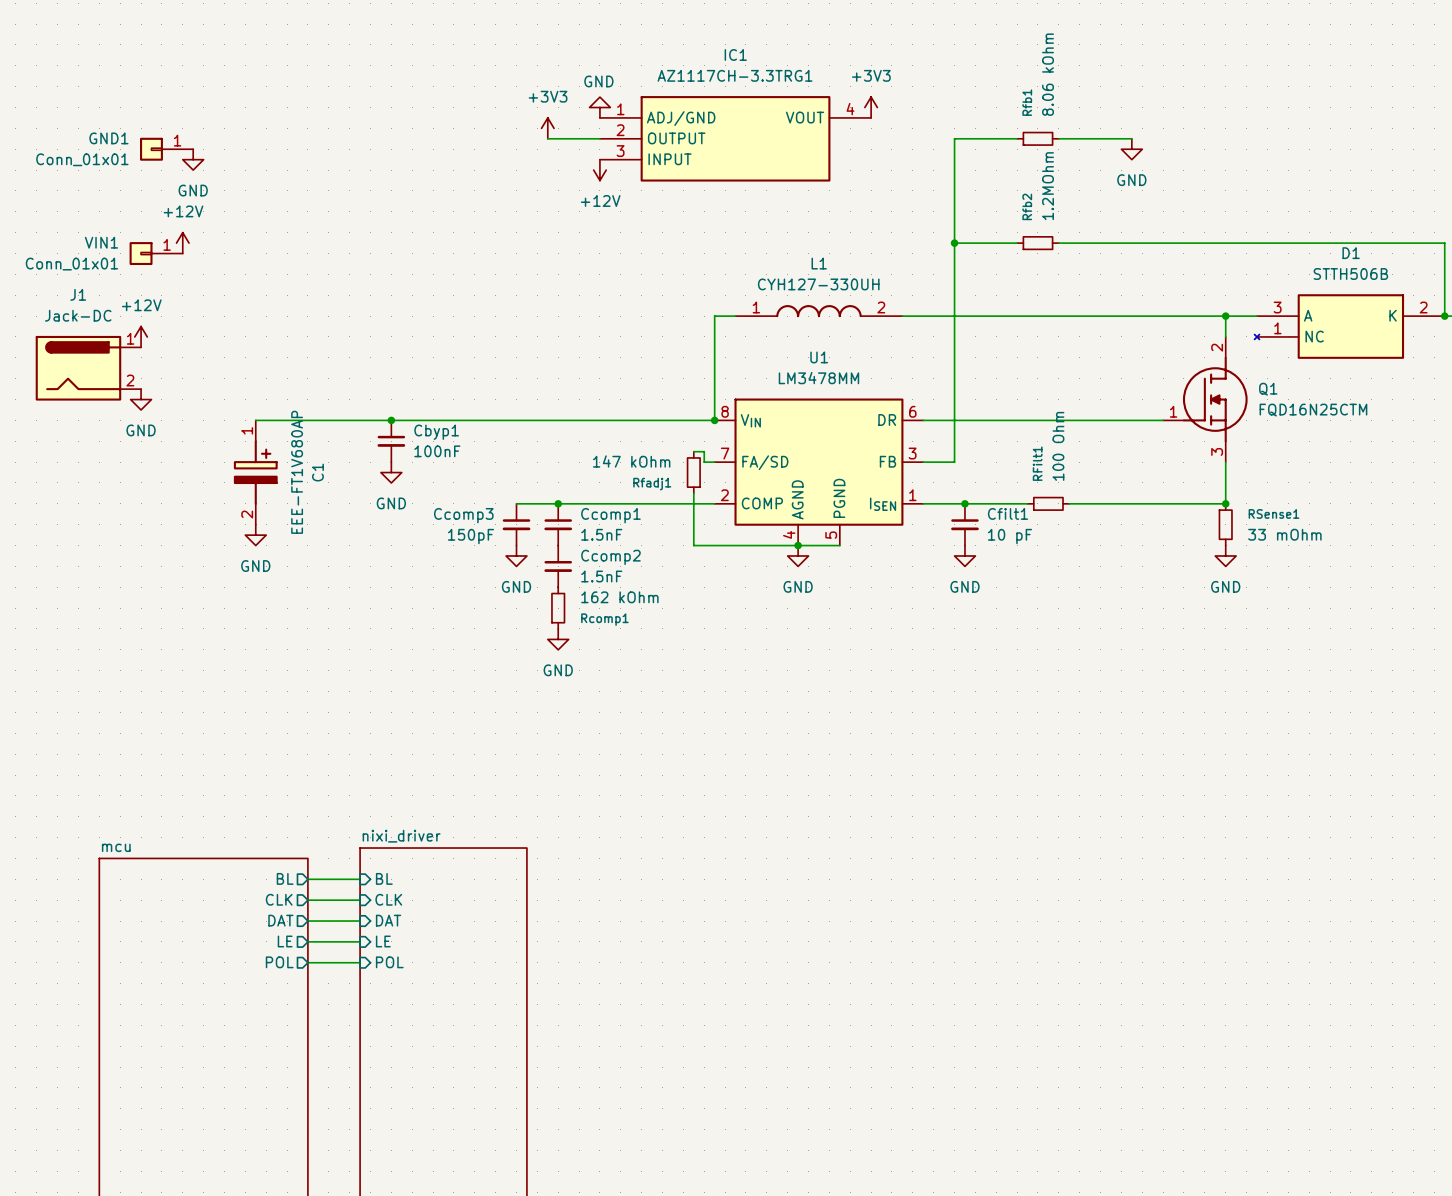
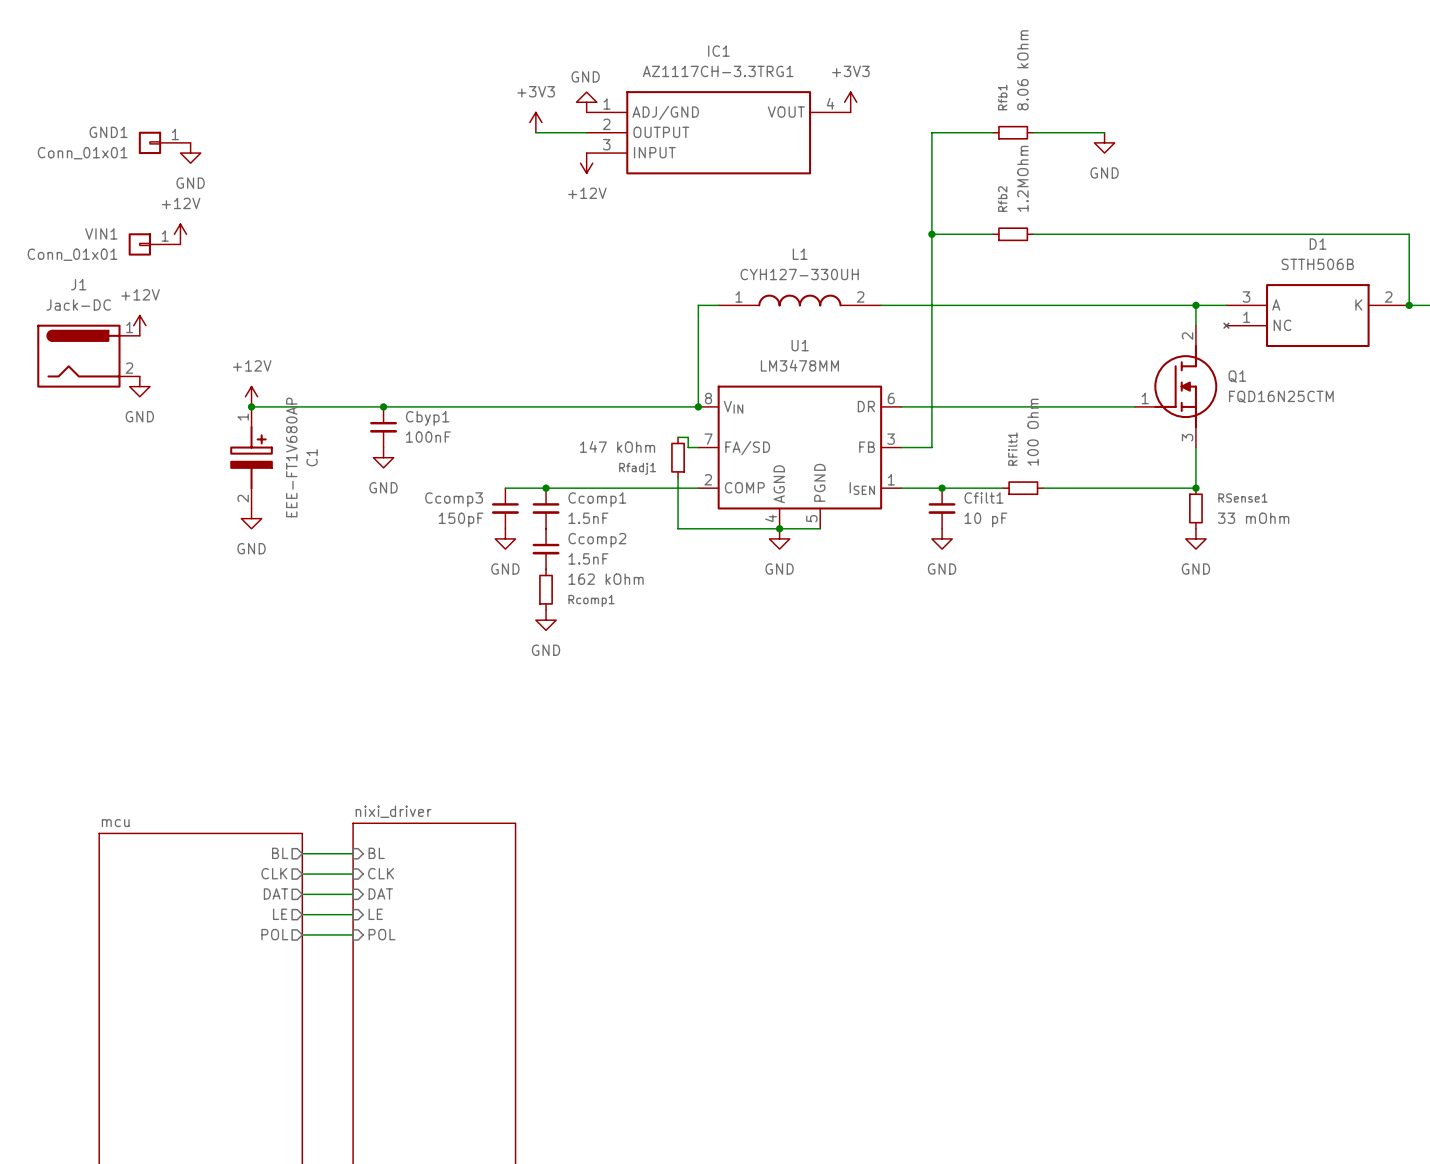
power symbol: none -> +12V (251, 396)
junction: none -> (251, 406)

